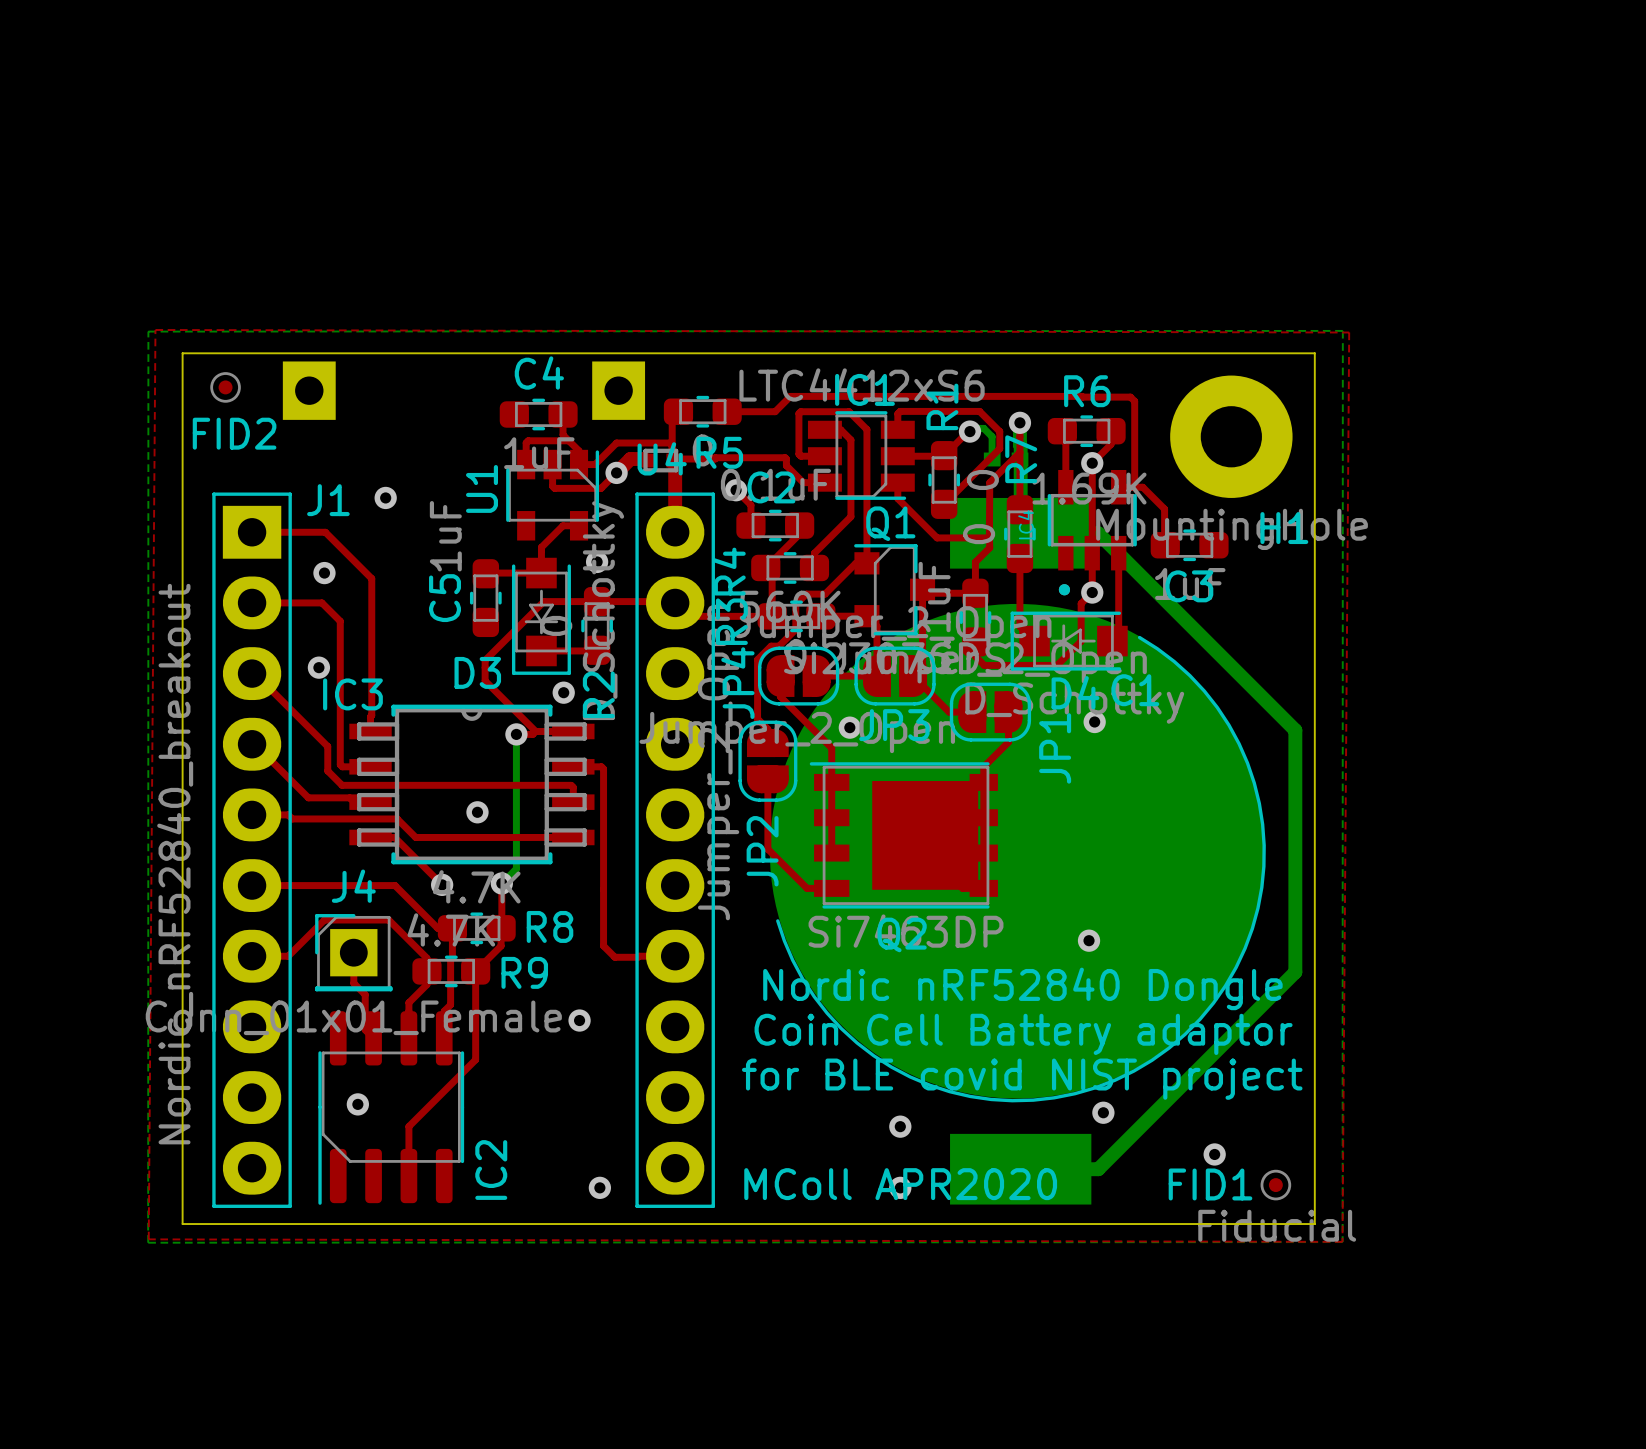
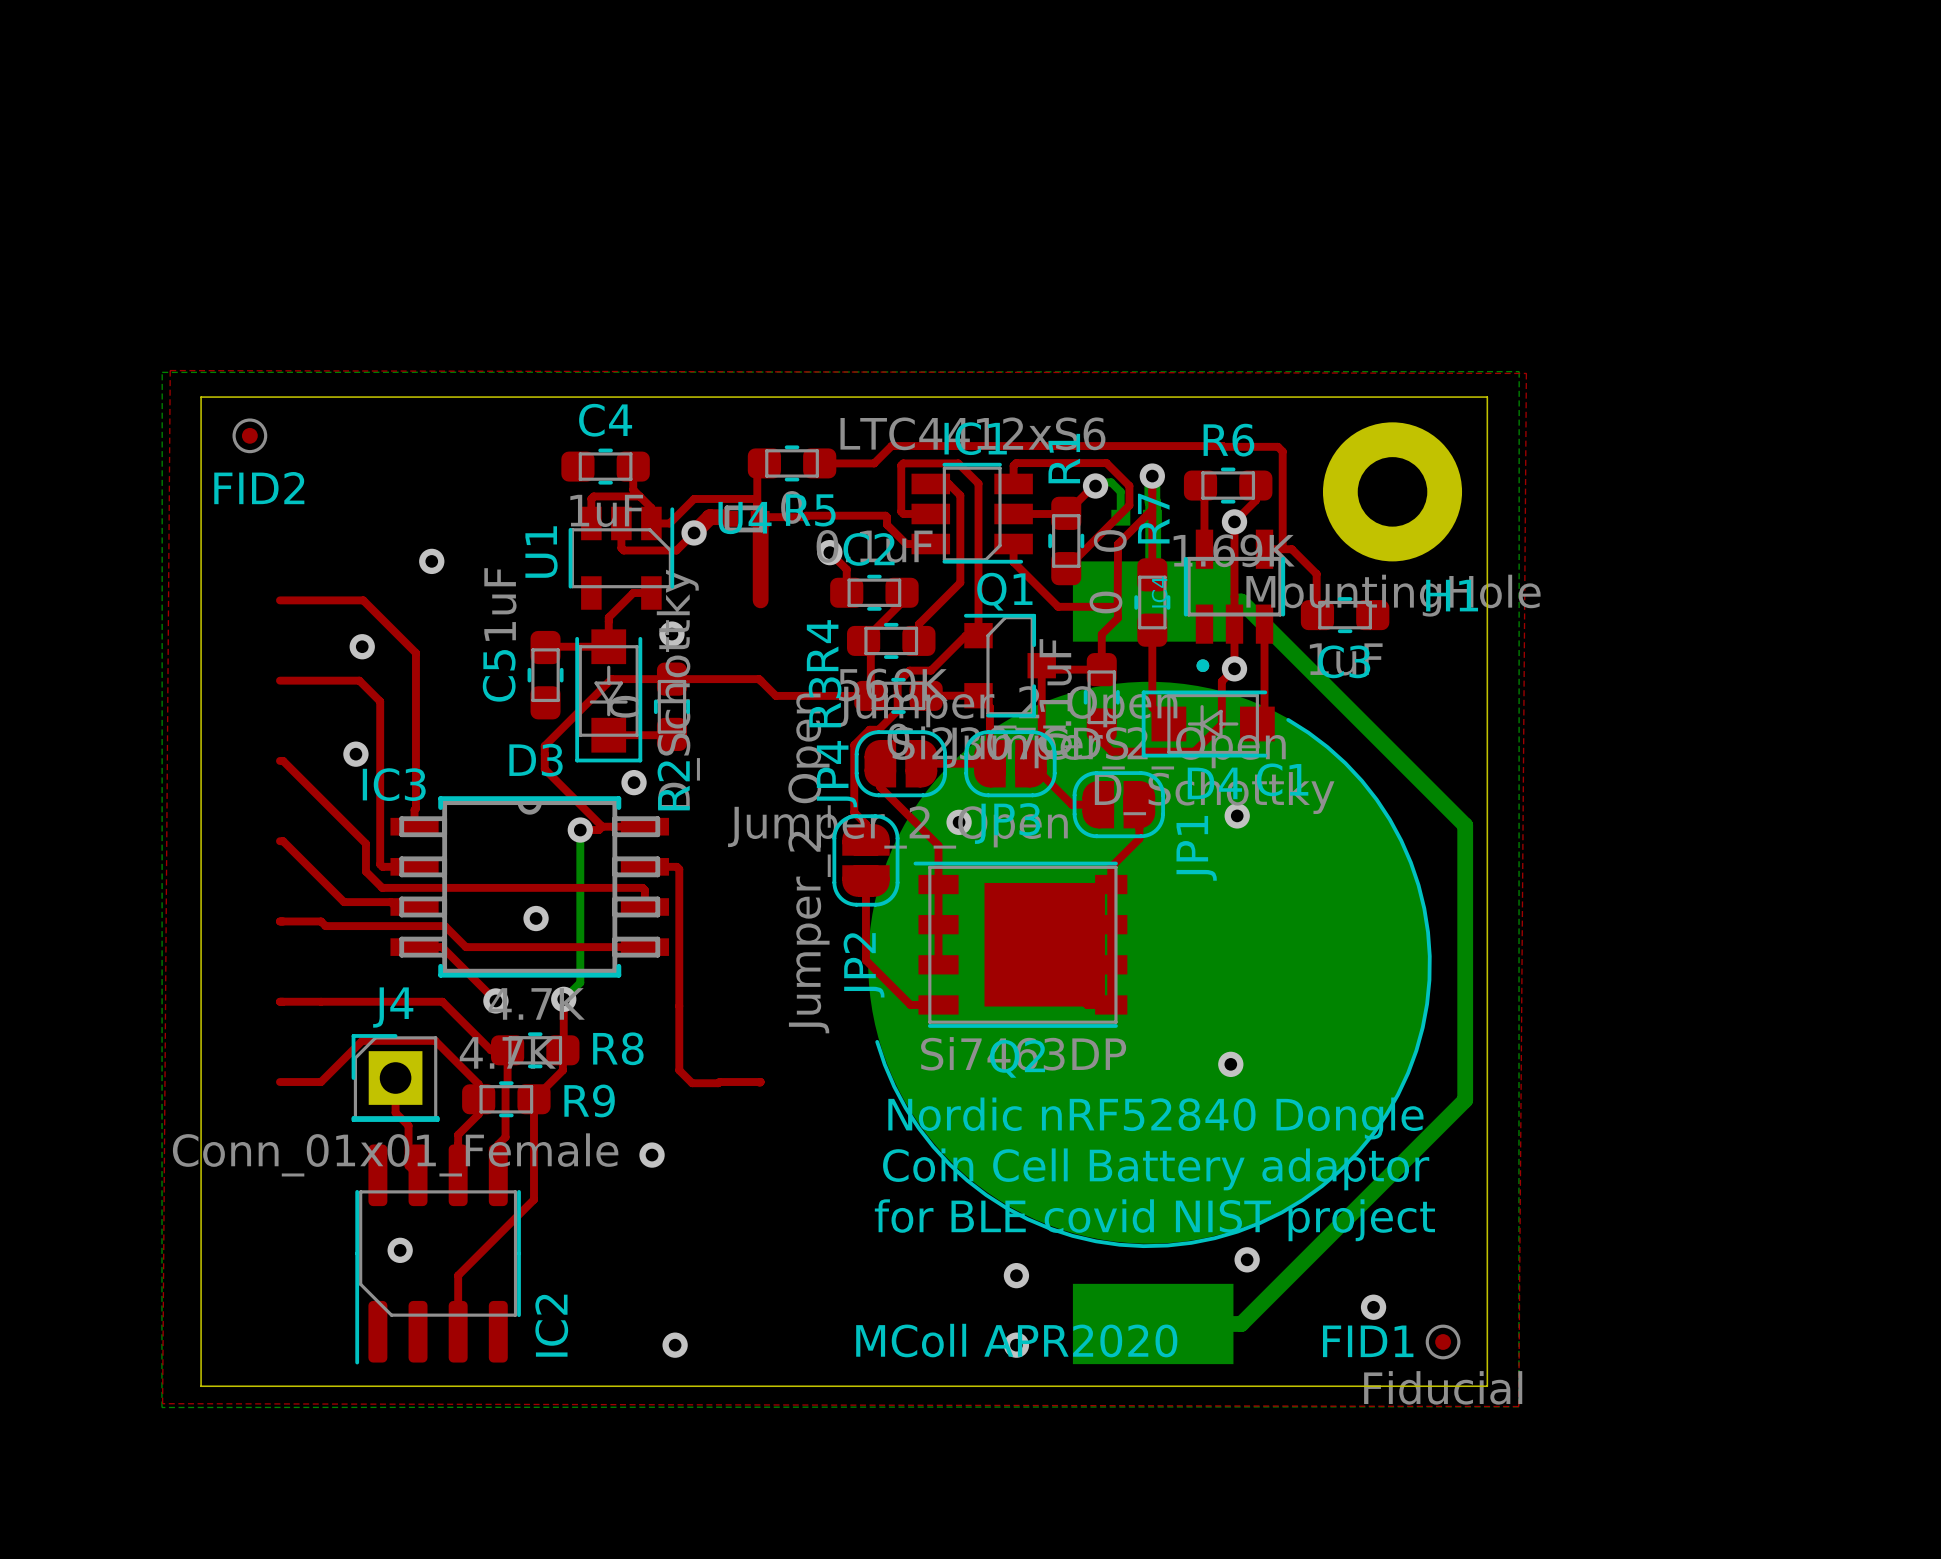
J1: Nordic_nRF52840_breakout (463, 784) -> none

